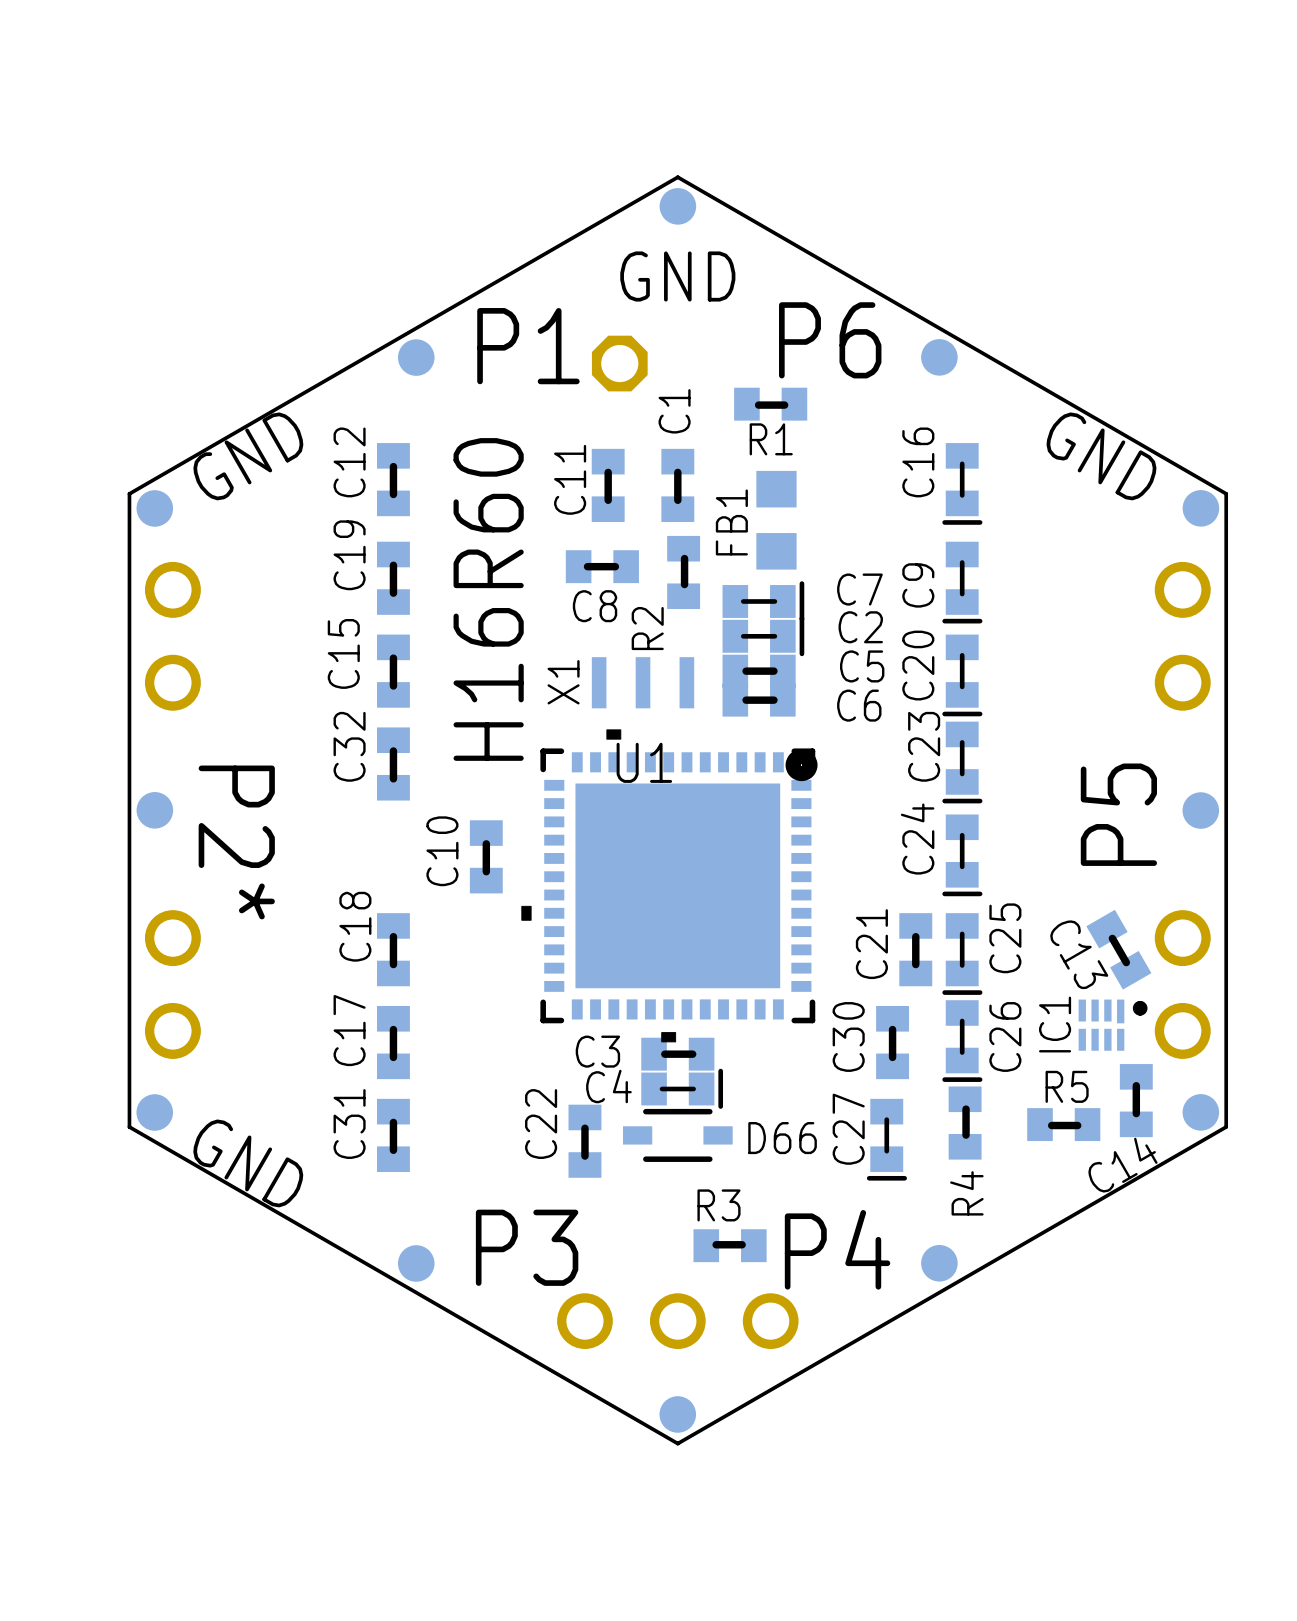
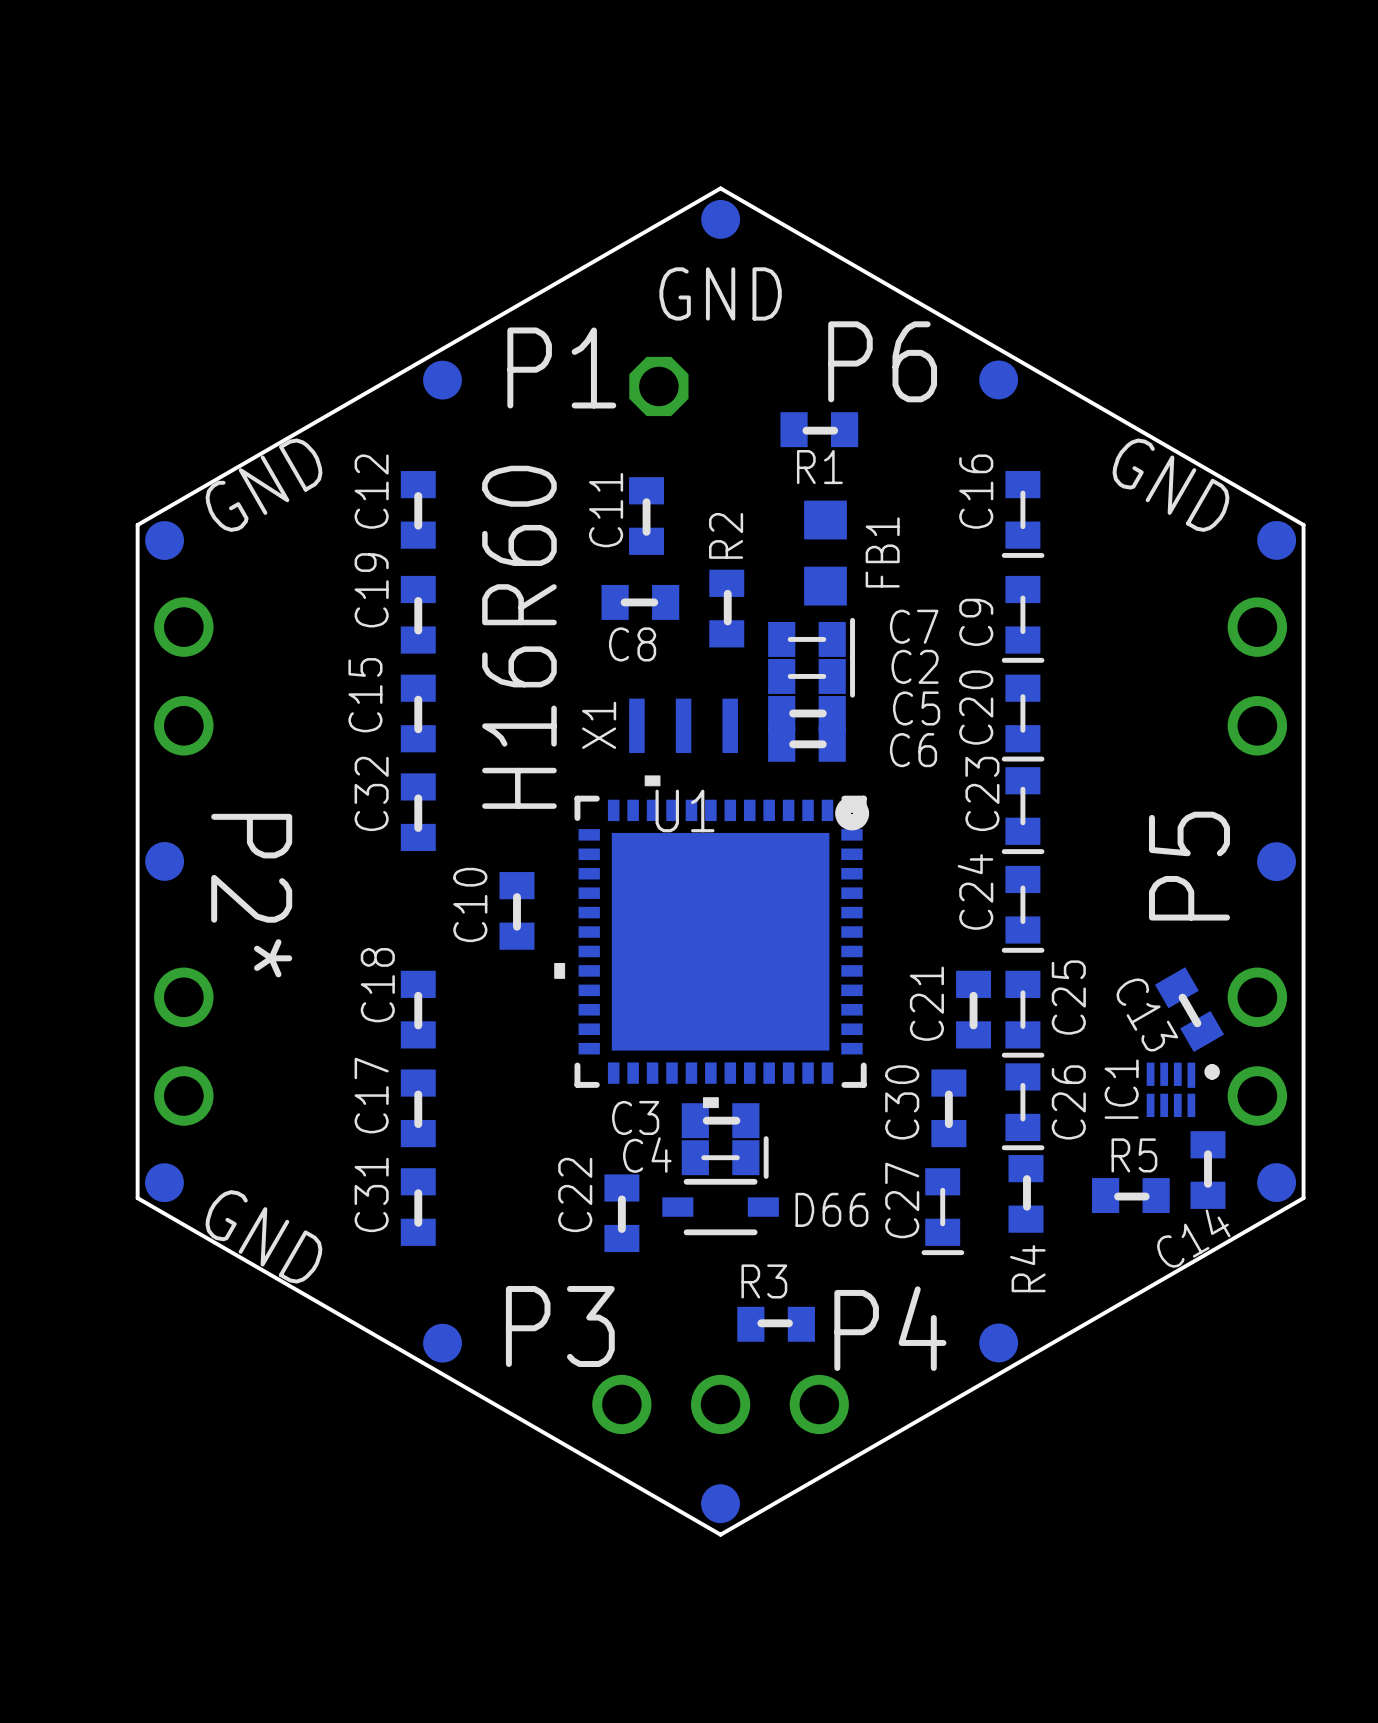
C1: (677, 485) -> none
FB1 name position: FB1 (731, 522) -> FB1 (882, 552)
R2 name position: R2 (647, 628) -> R2 (726, 535)

